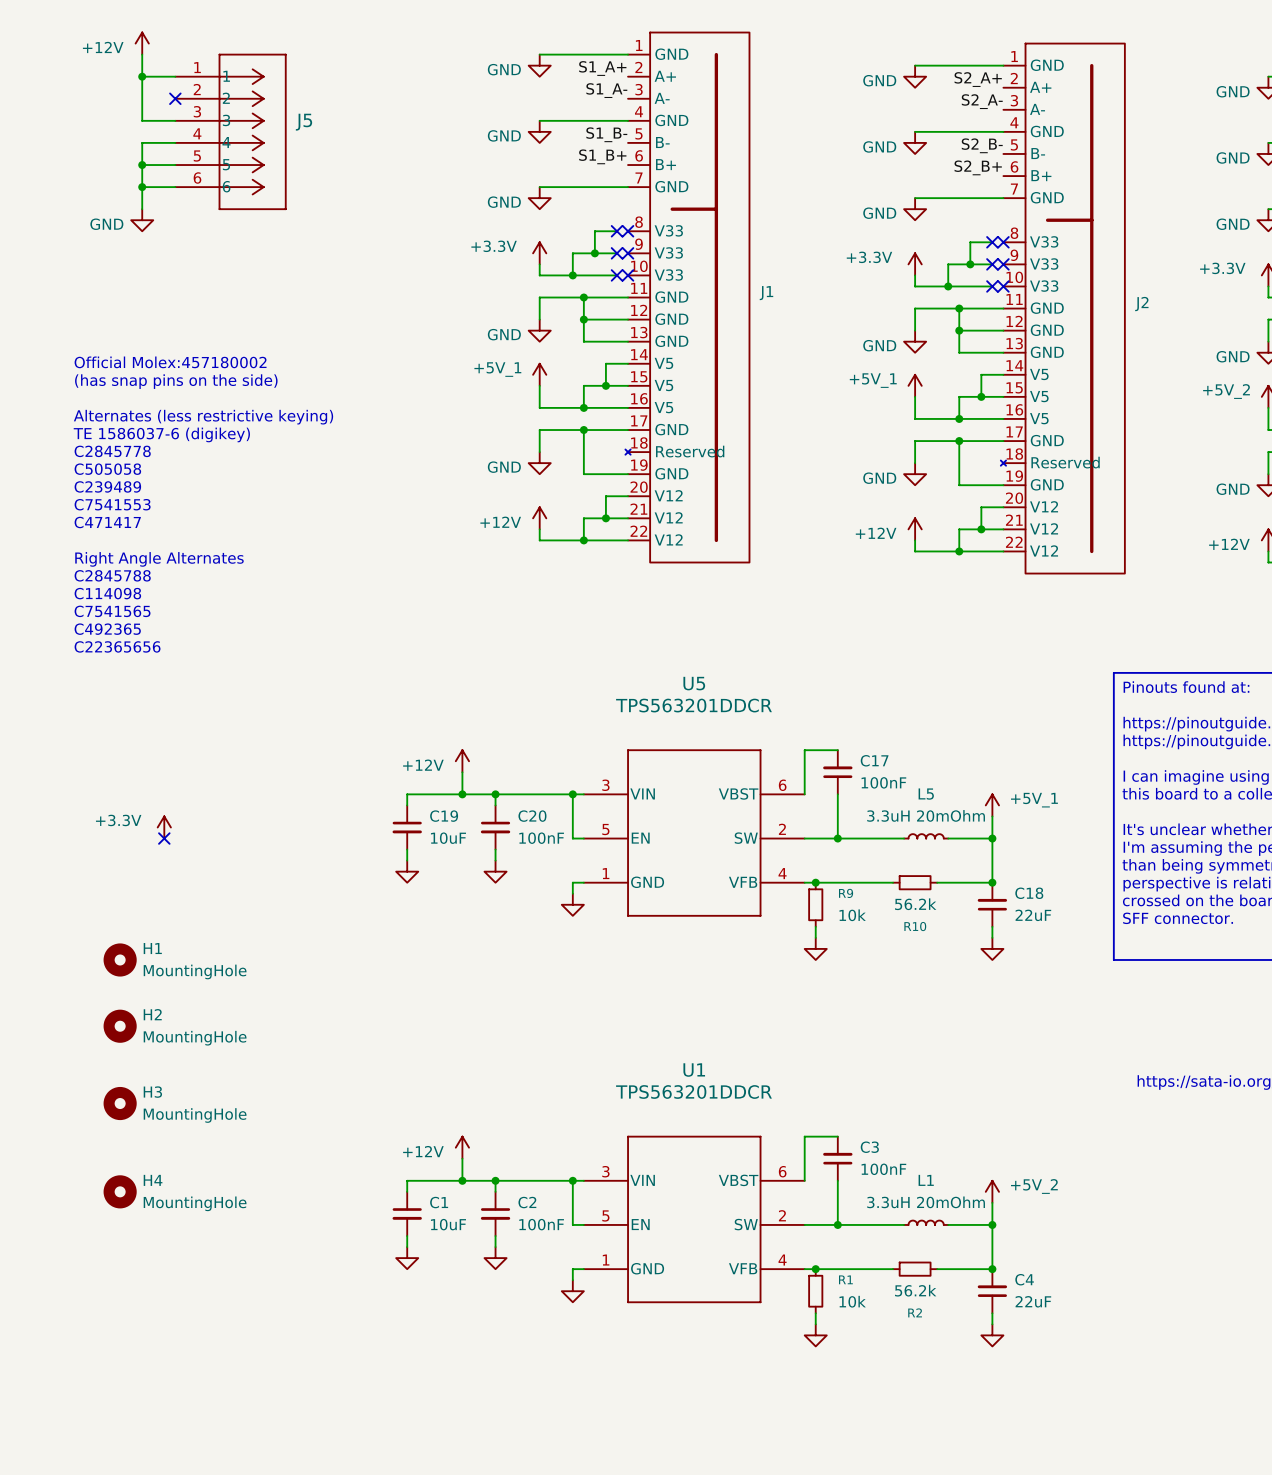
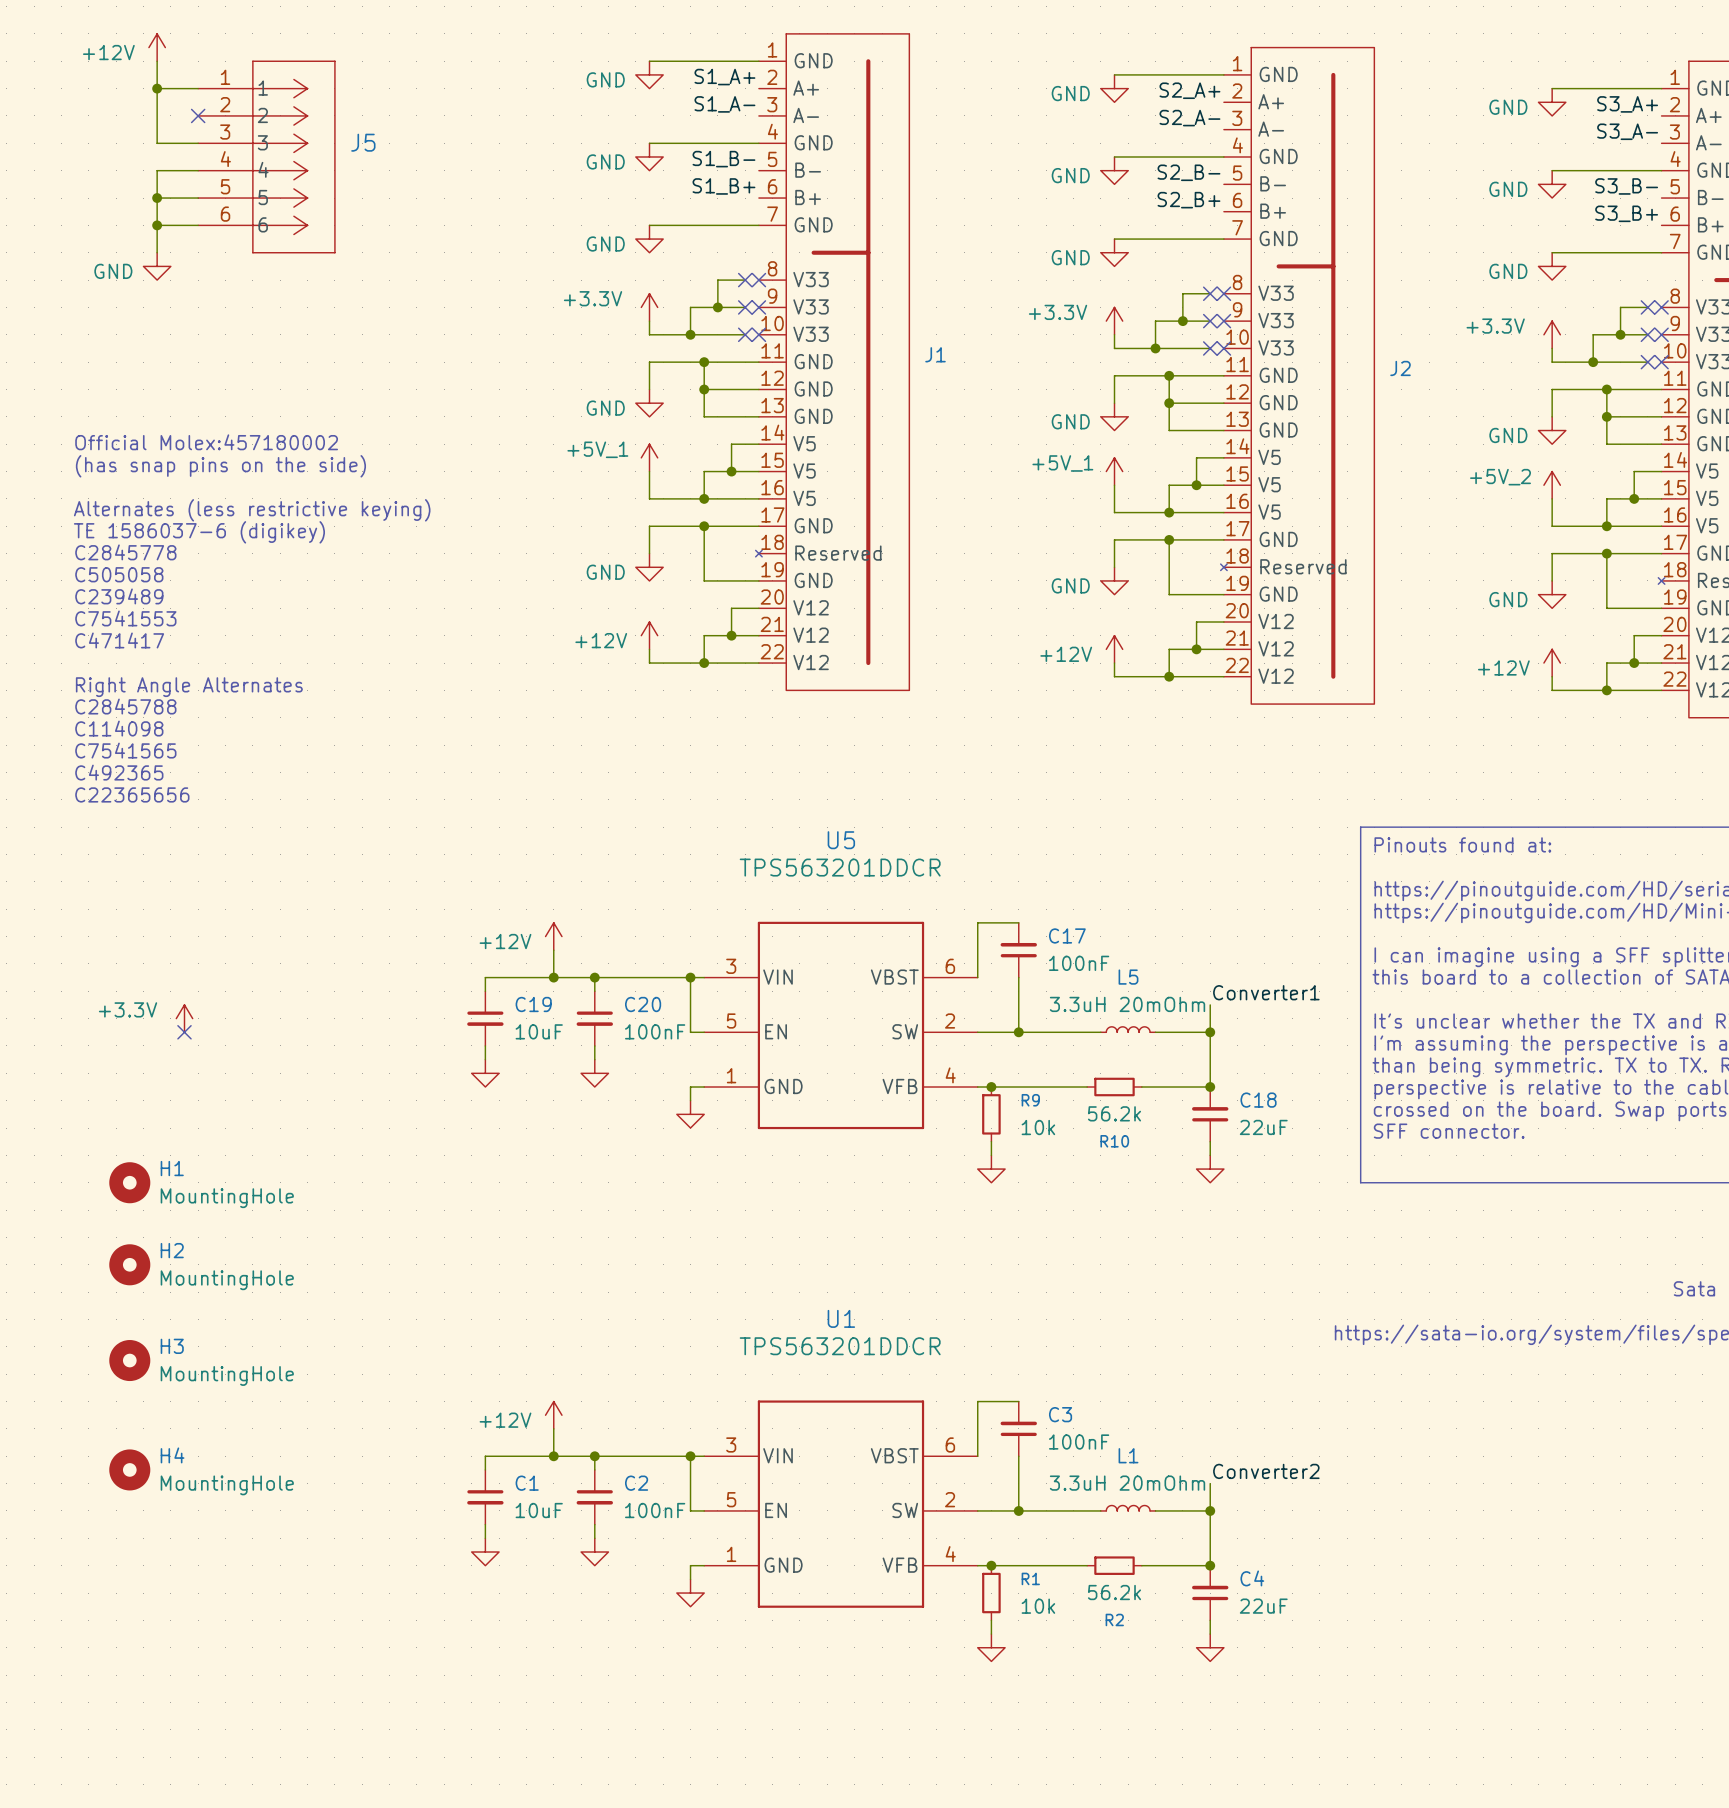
power symbol: +5V_1 (992, 805) -> none
label: none -> Converter1 (1266, 992)
power symbol: +5V_2 (992, 1191) -> none
label: none -> Converter2 (1266, 1471)

